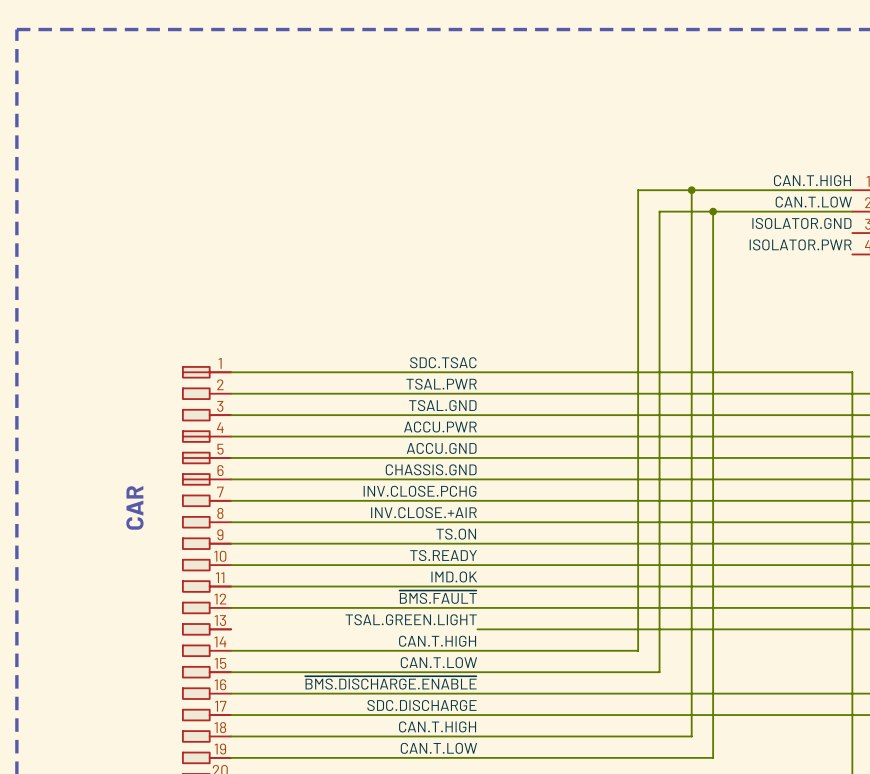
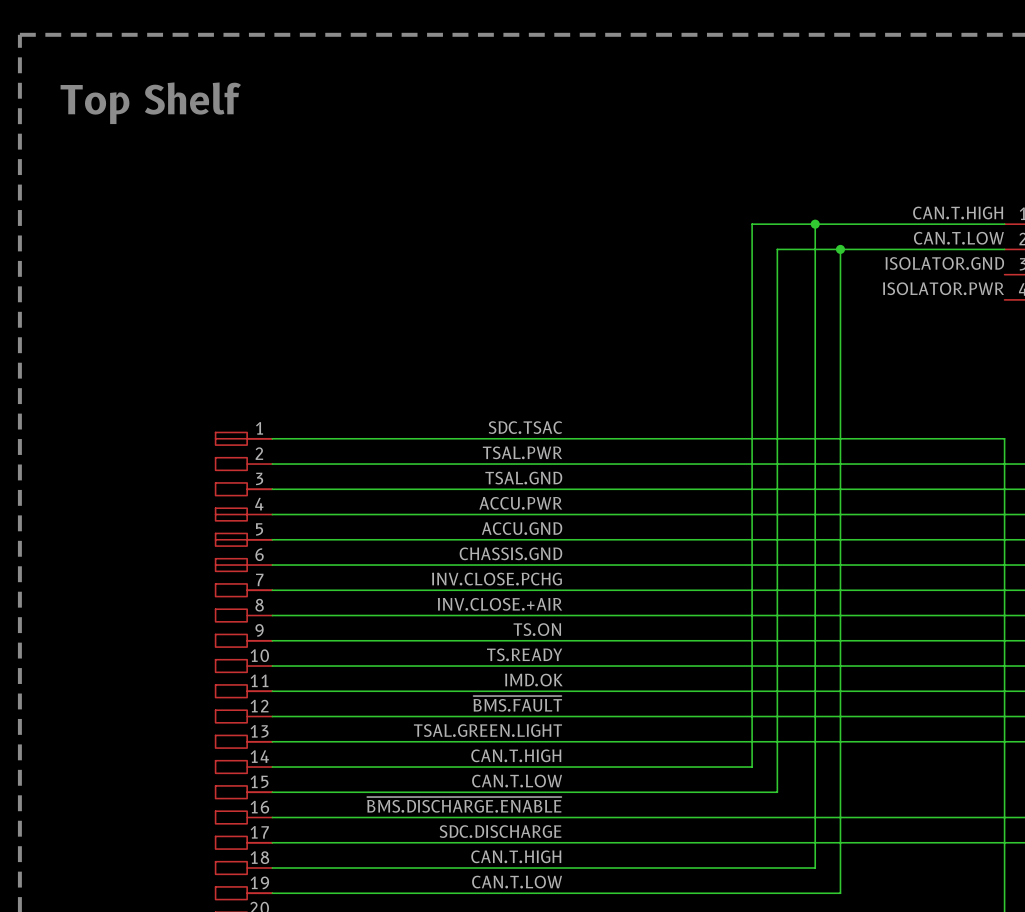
text: none -> Top Shelf (150, 103)
text: CAR (134, 507) -> none
wire: none -> (272, 741) (562, 741)

